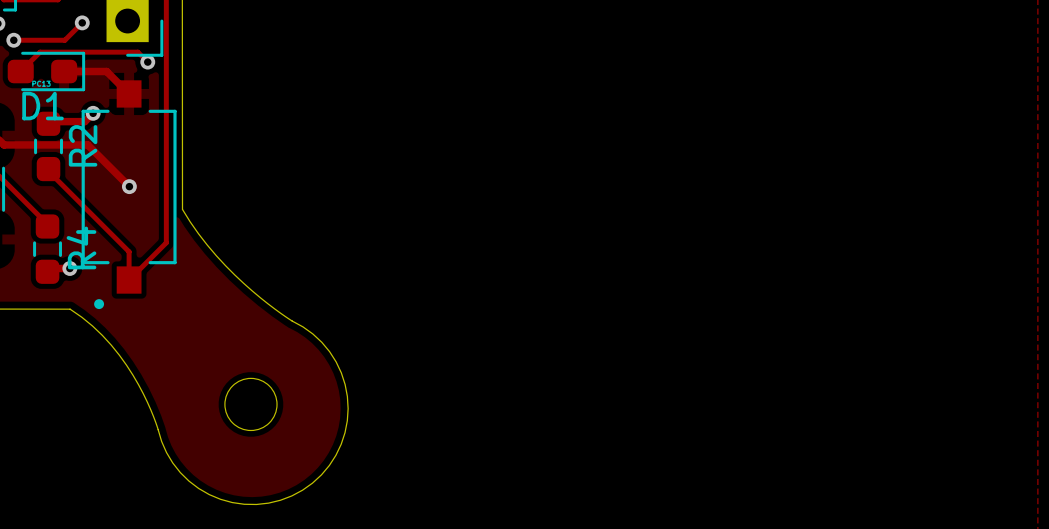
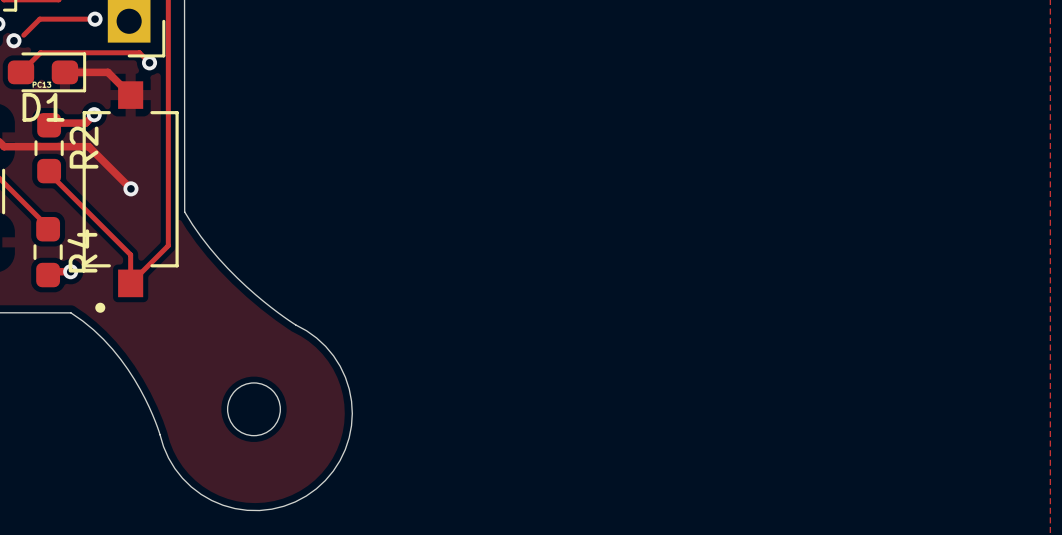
track: none -> (95, 19) (39, 19) (23, 35)
track: (82, 22) (64, 40) (13, 40) -> none
via position: (82, 22) -> (95, 19)

